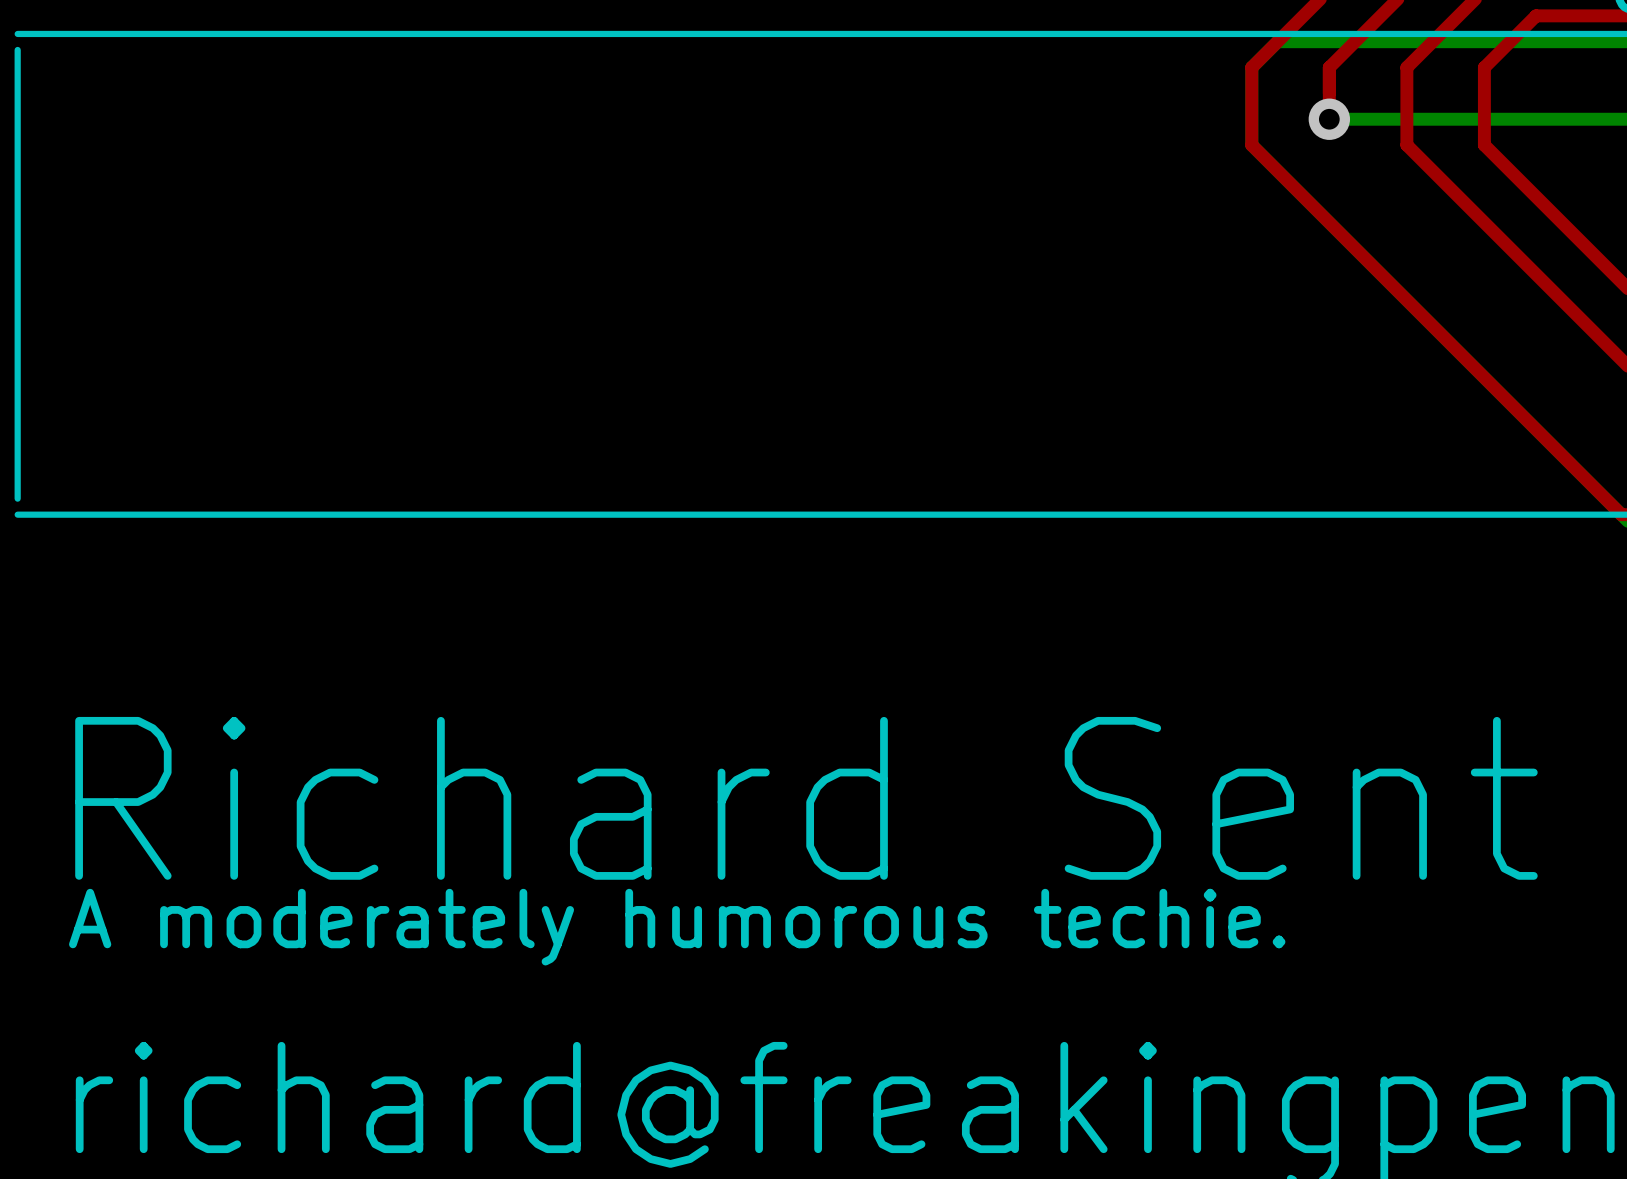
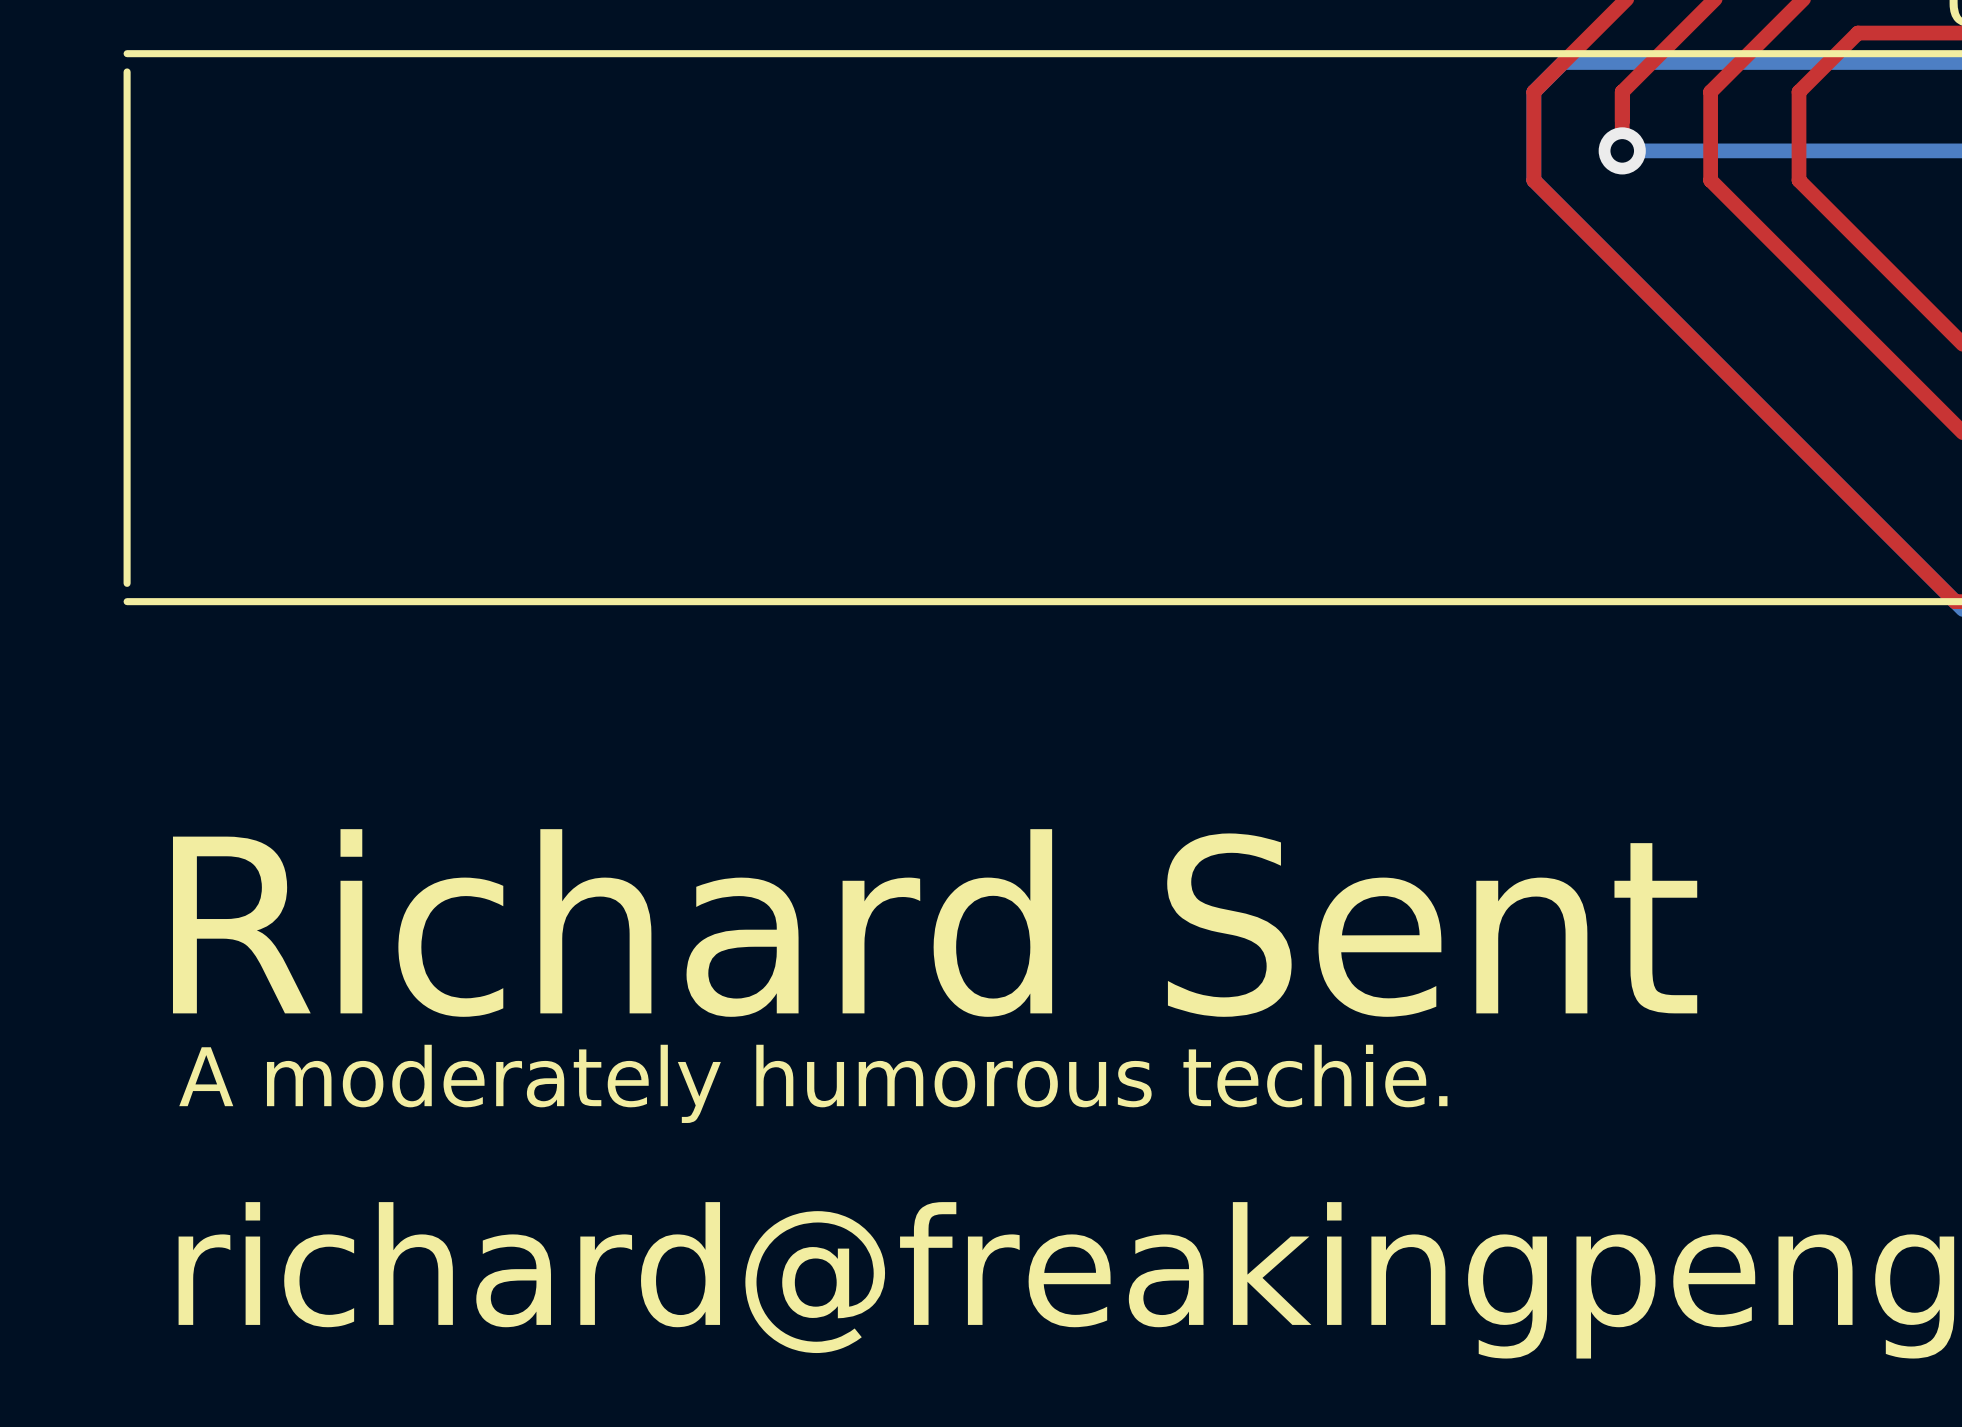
text position: A moderately humorous techie. (677, 927) -> A moderately humorous techie. (813, 1083)

